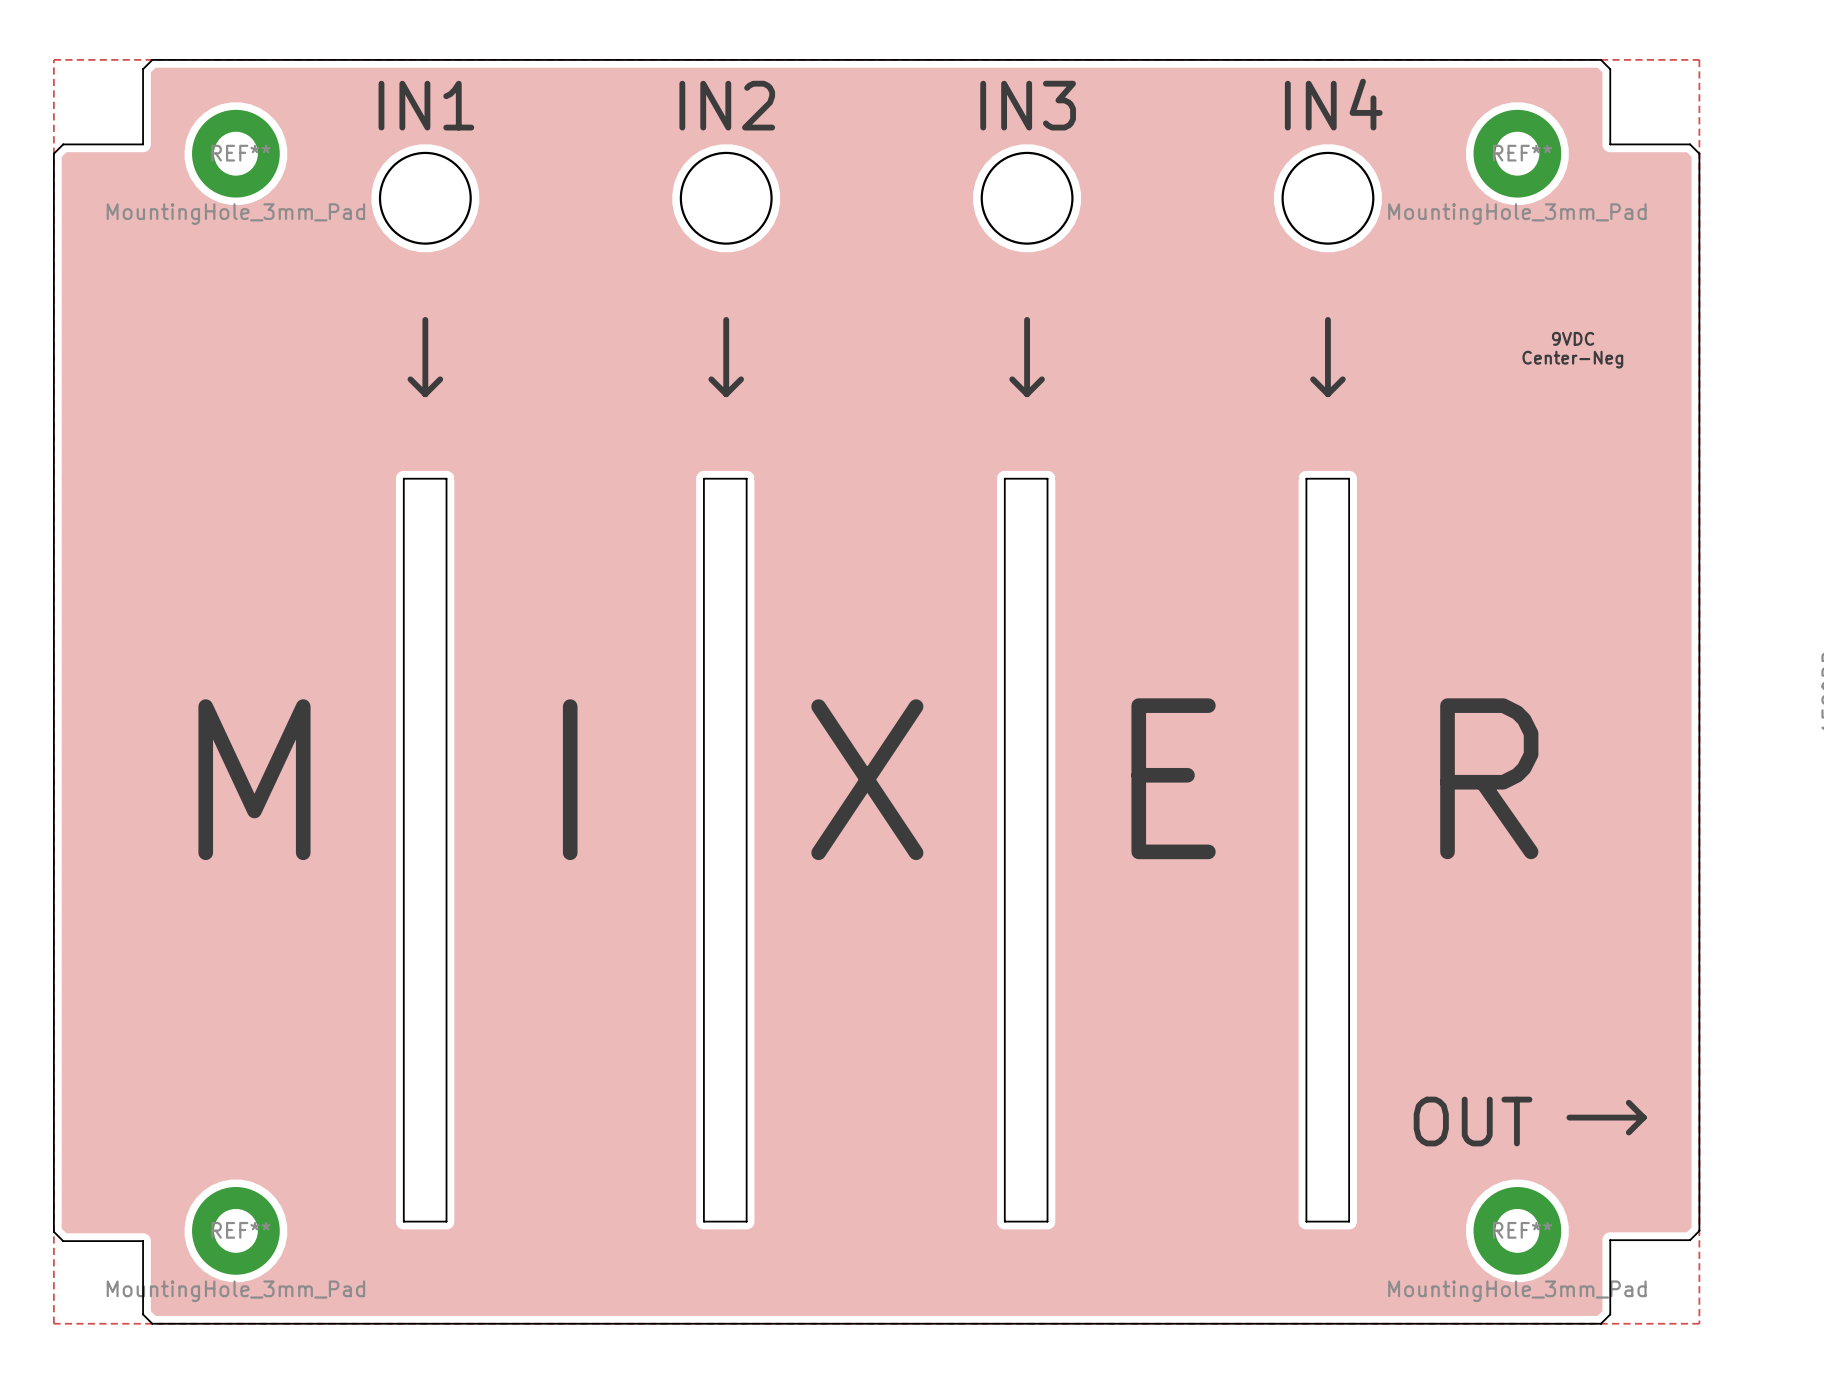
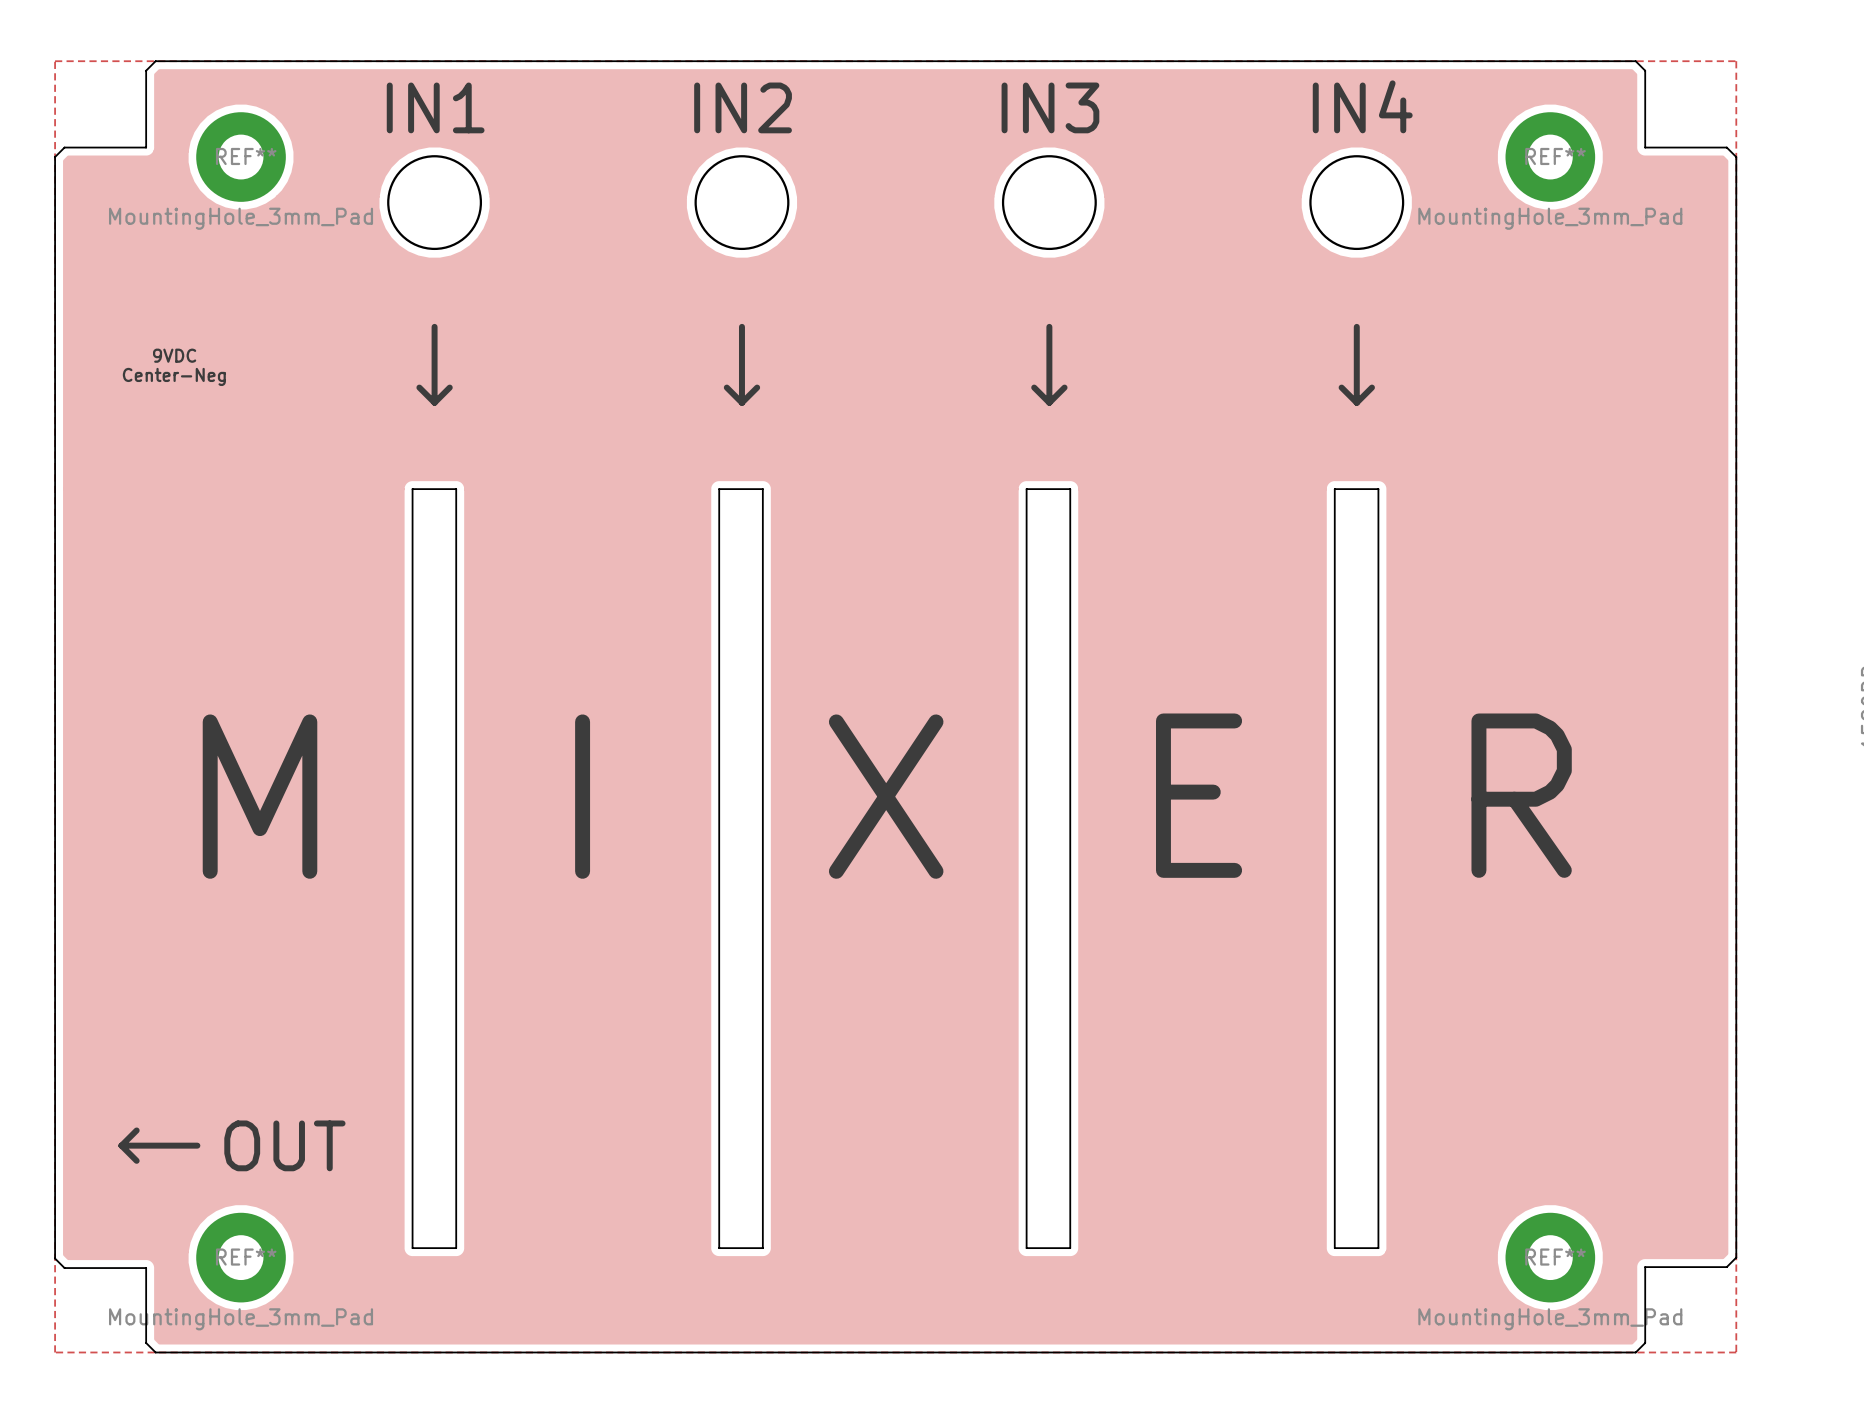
text: 9VDC (1573, 338) -> none
text: none -> 9VDC (174, 355)
text: Center-Neg (1572, 359) -> none
text: none -> Center-Neg (174, 376)
line: (1628, 1102) (1643, 1117) -> none
line: none -> (136, 1130) (121, 1145)
line: (1569, 1117) (1643, 1117) -> none
line: (1643, 1117) (1628, 1132) -> none
line: none -> (121, 1145) (197, 1145)
line: none -> (121, 1145) (136, 1160)
text: none -> OUT (284, 1145)
text: OUT (1473, 1121) -> none

